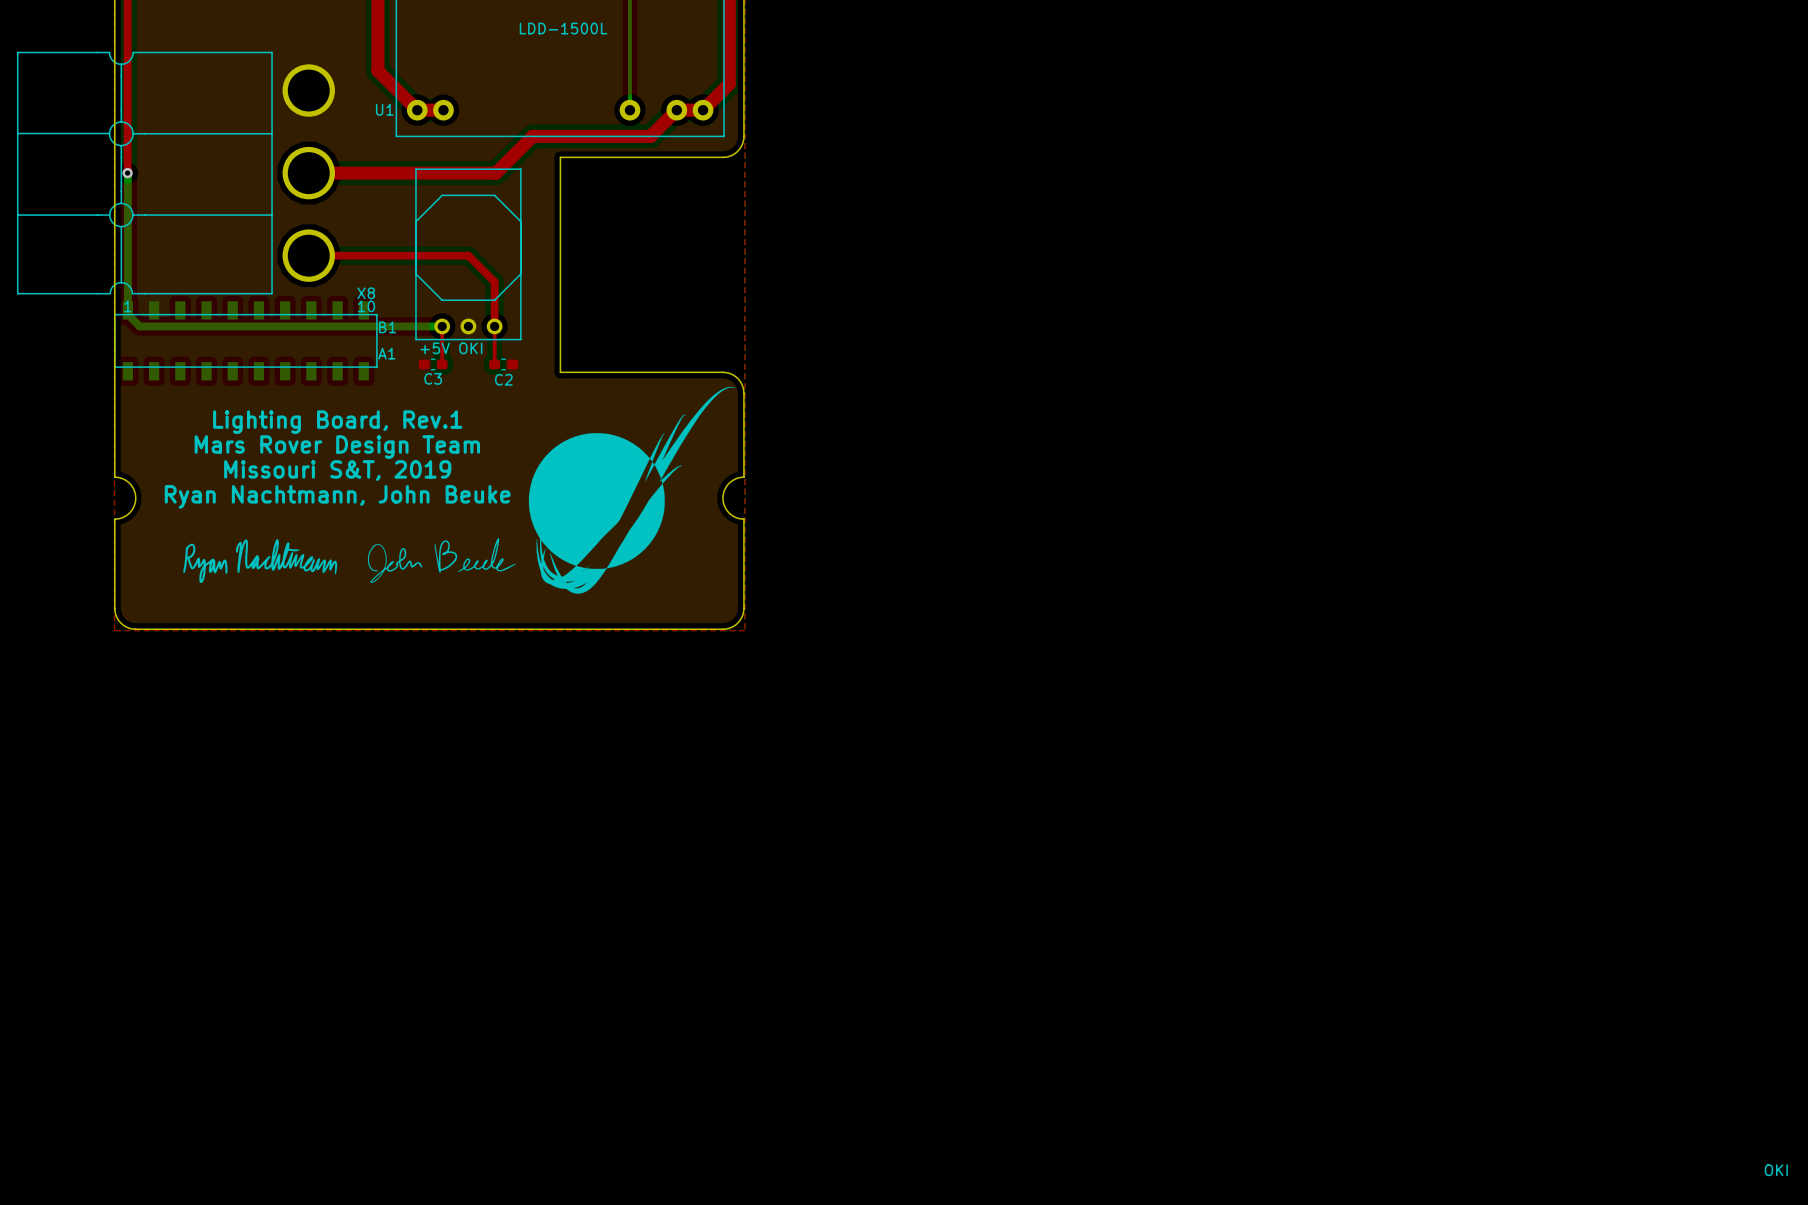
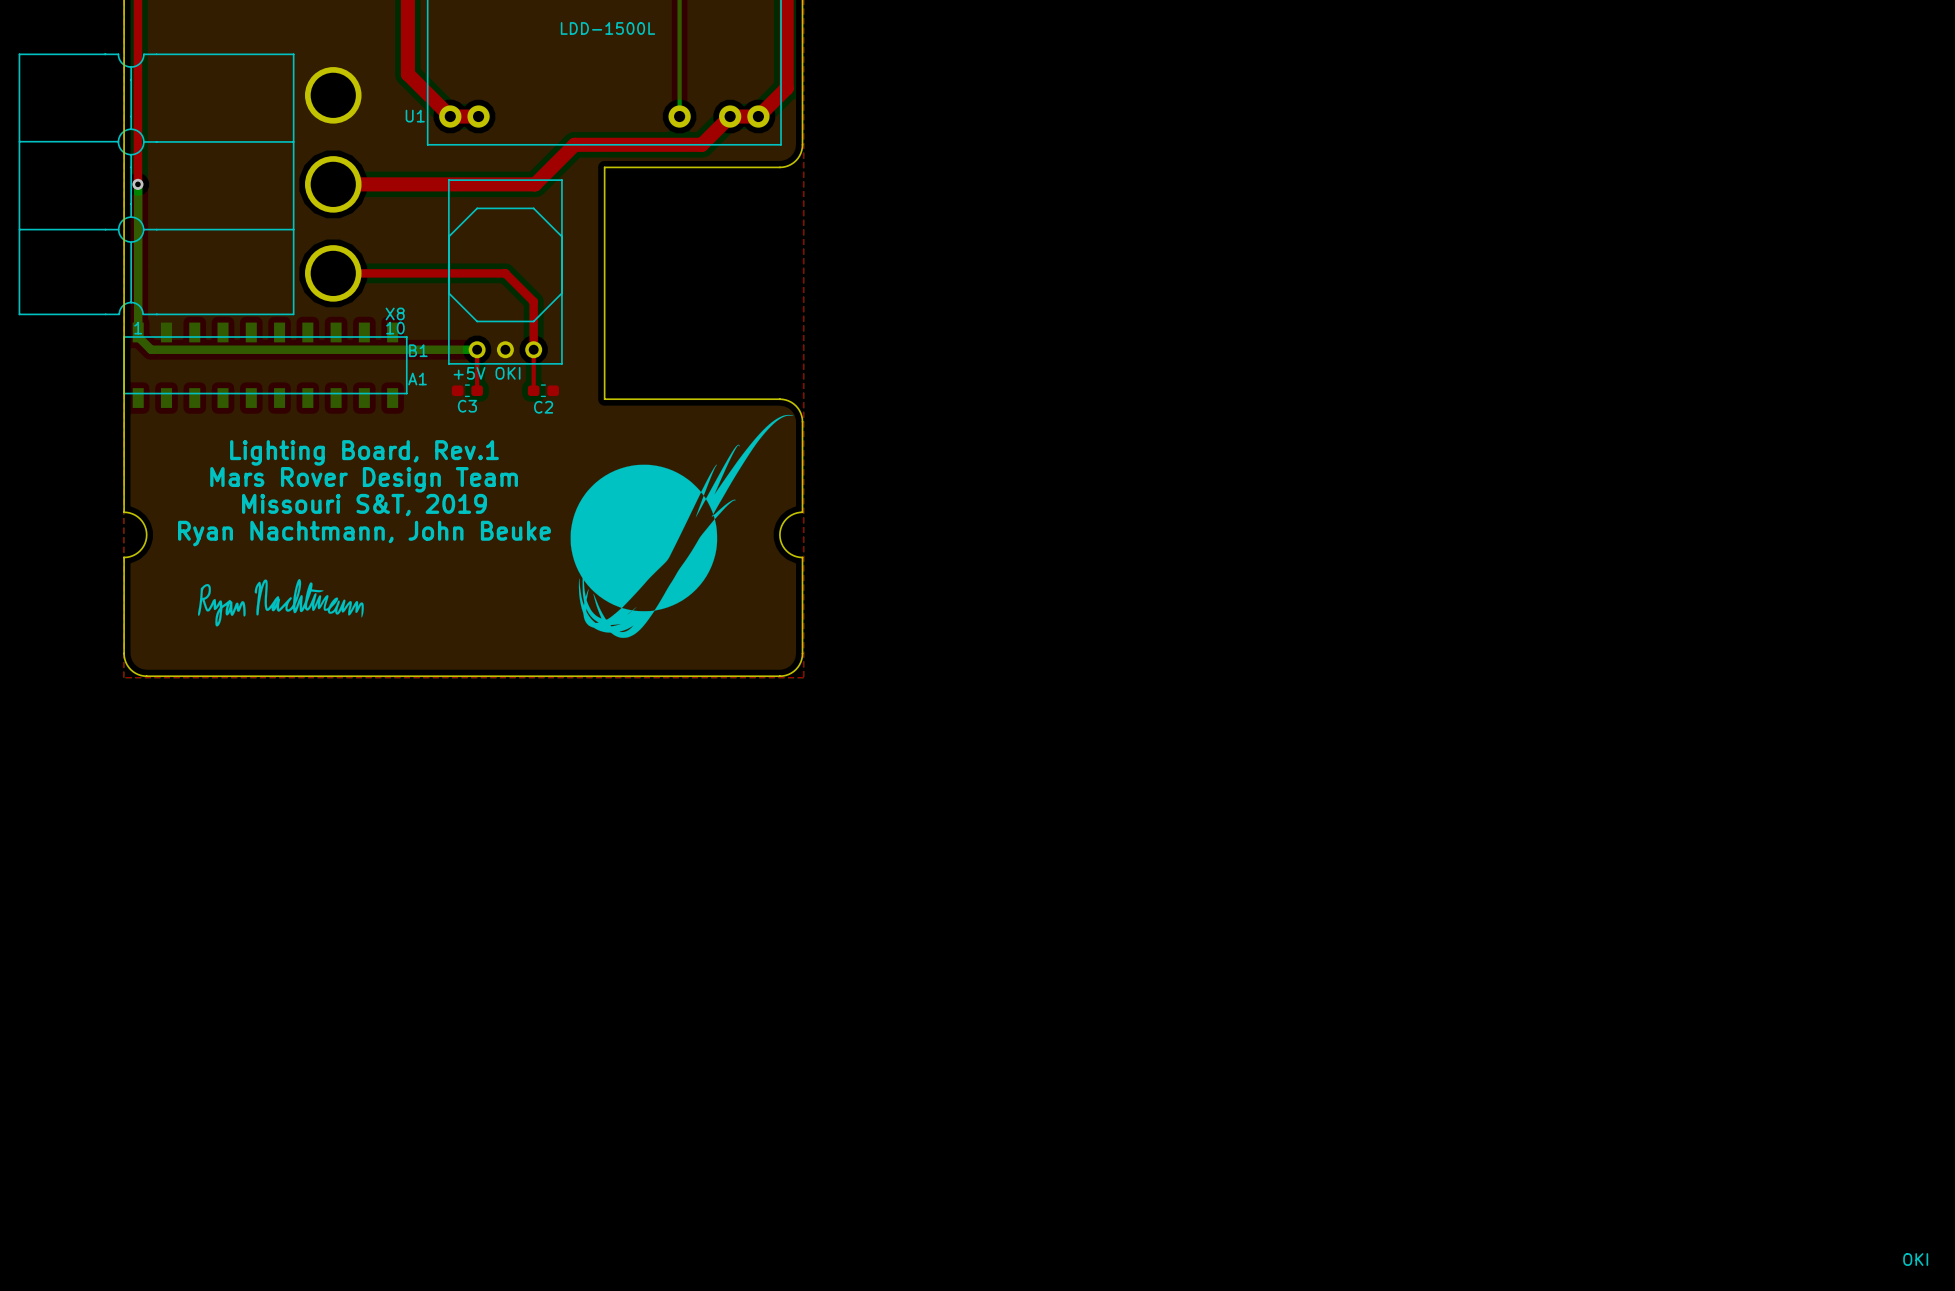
drawing: [367, 538, 516, 584] -> none

